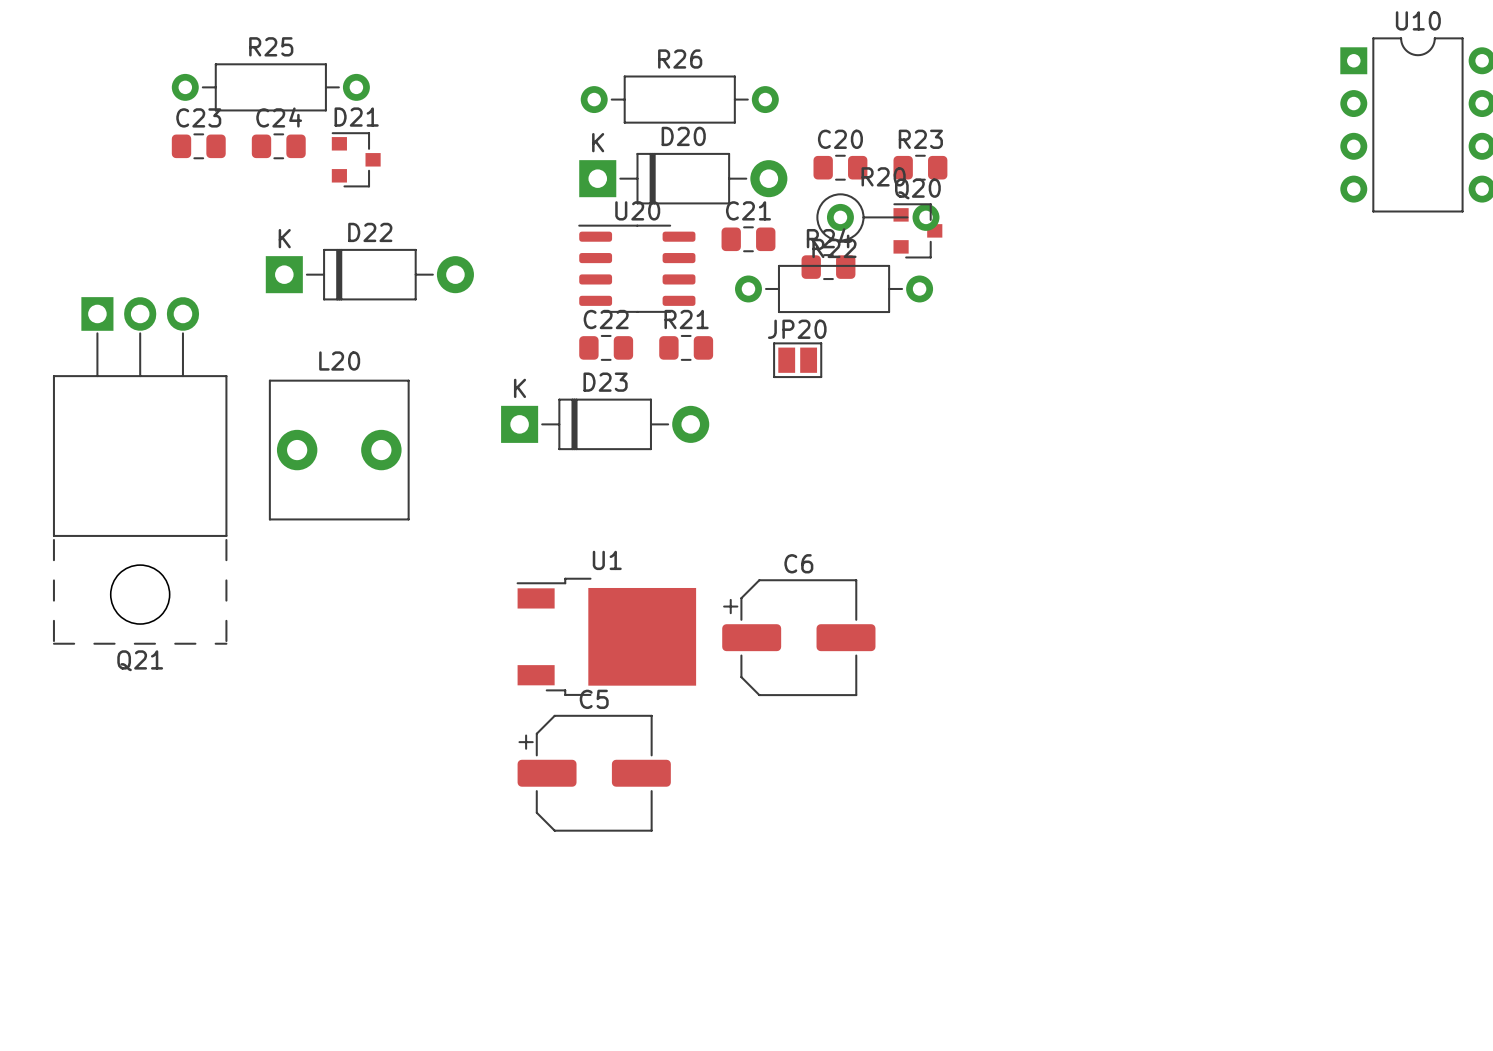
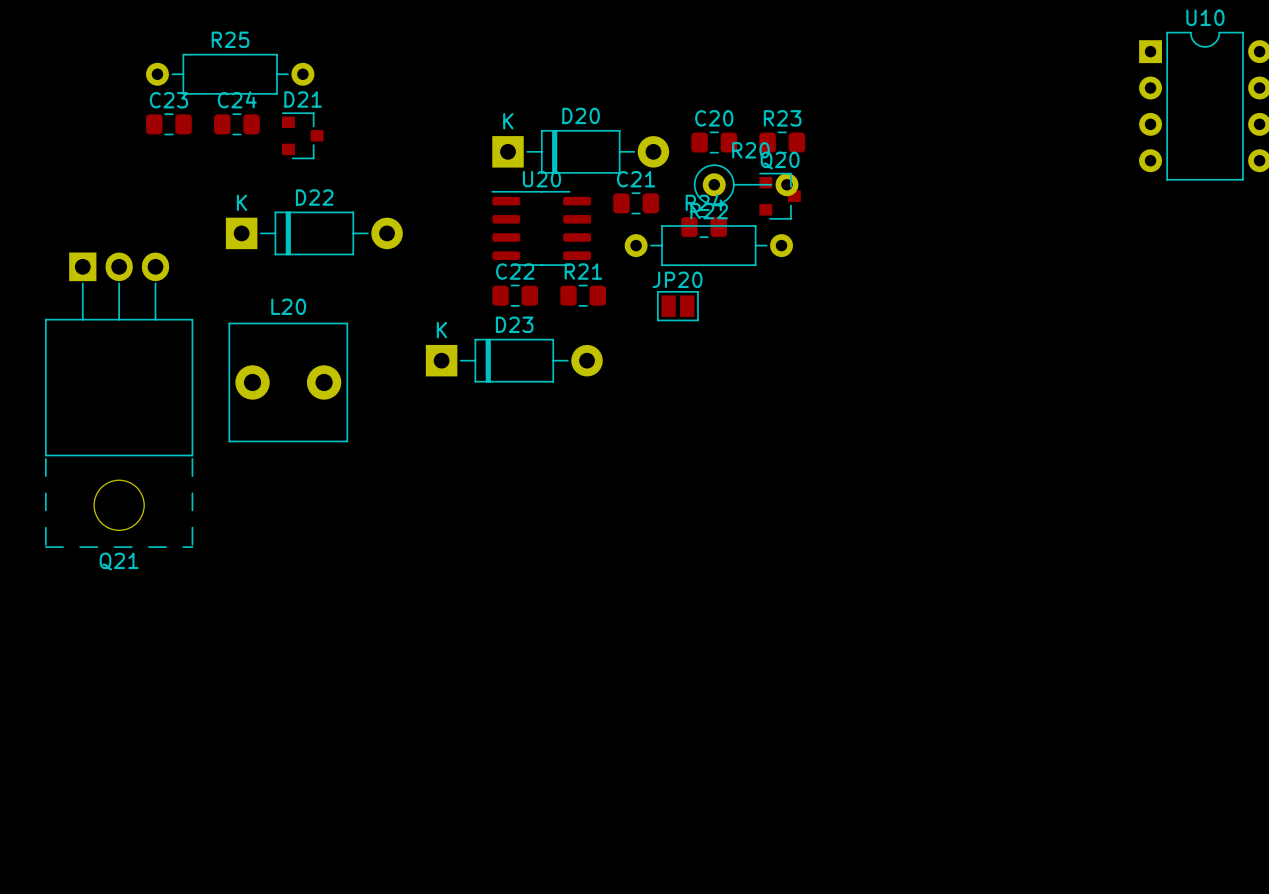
R26: (679, 99) -> none
U1: (606, 636) -> none
C6: (798, 637) -> none
C5: (594, 773) -> none

